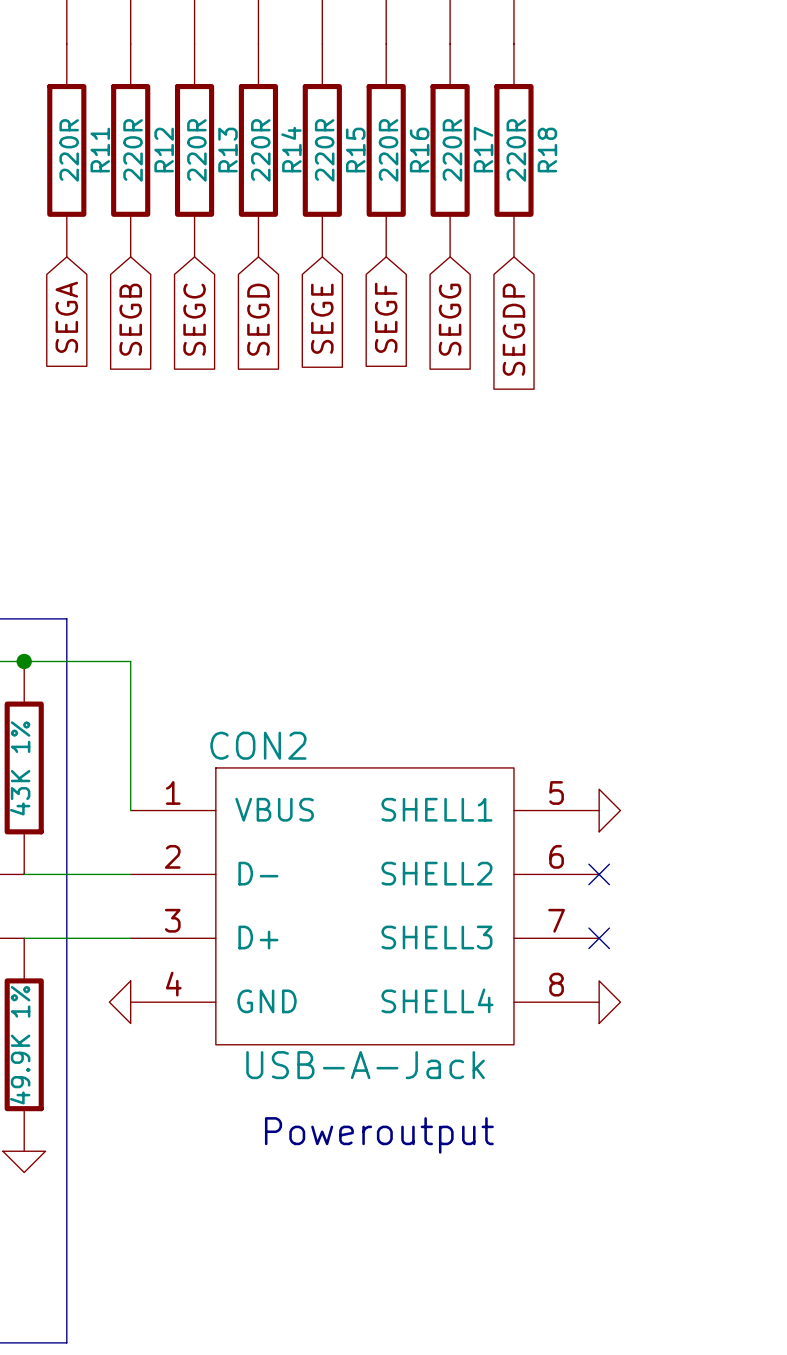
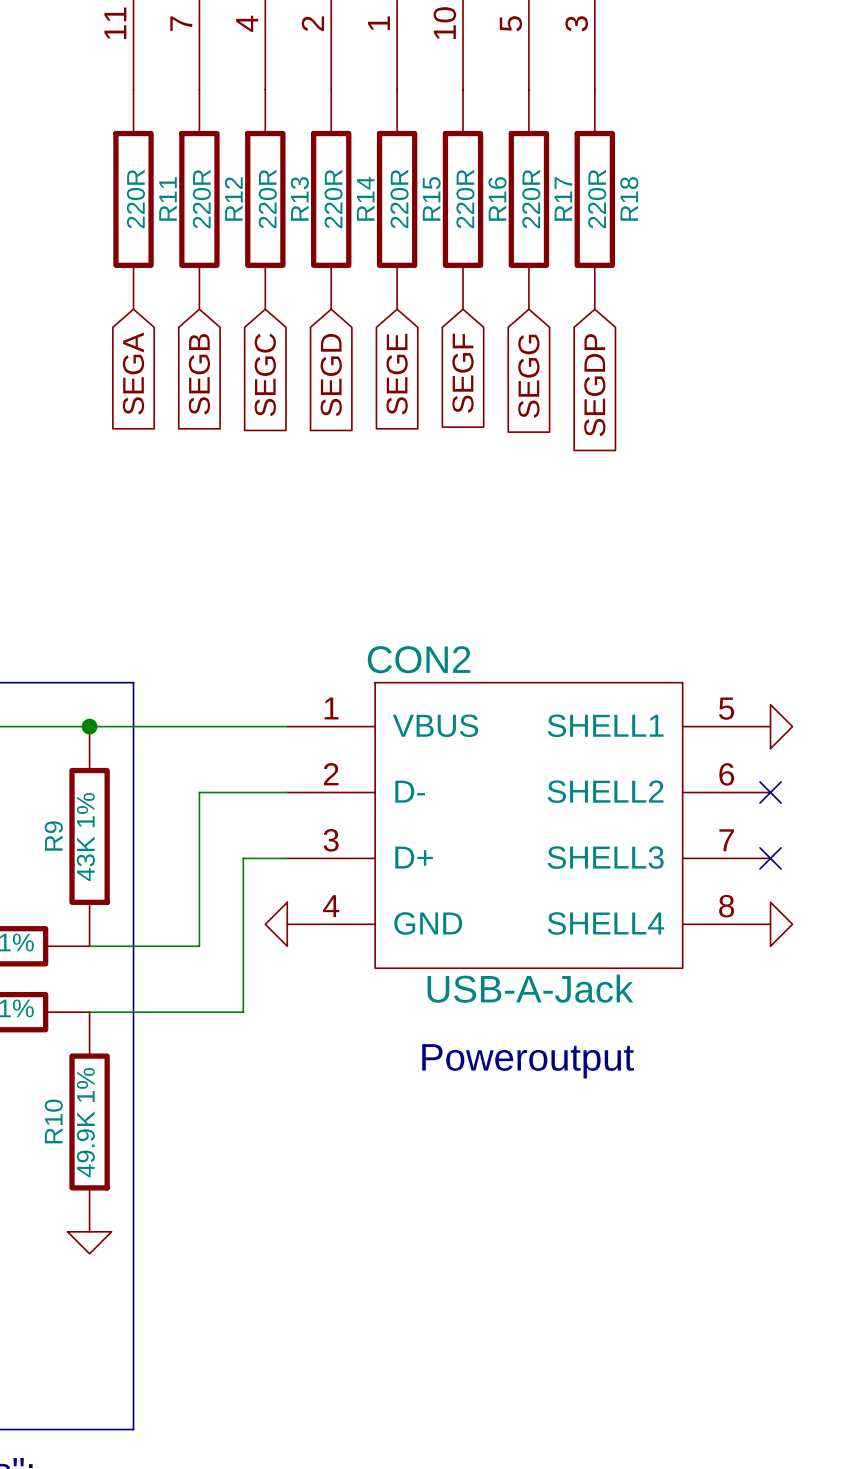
wire: (130, 661) (130, 725) -> (199, 726) (287, 726)
power symbol: none -> (781, 726)
wire: none -> (199, 792) (287, 792)
no-connect mark: none -> (770, 792)
wire: none -> (287, 858) (243, 858) (243, 1012) (199, 1012)
no-connect mark: none -> (770, 858)
wire: none -> (199, 880) (199, 946)
power symbol: (609, 810) -> none
power symbol: none -> (781, 924)
no-connect mark: (599, 874) -> none
CON2 position: (364, 906) -> (528, 825)
no-connect mark: (599, 938) -> none
power symbol position: (120, 1002) -> (276, 924)
power symbol: (609, 1002) -> none
text position: Poweroutput (379, 1135) -> Poweroutput (528, 1061)

